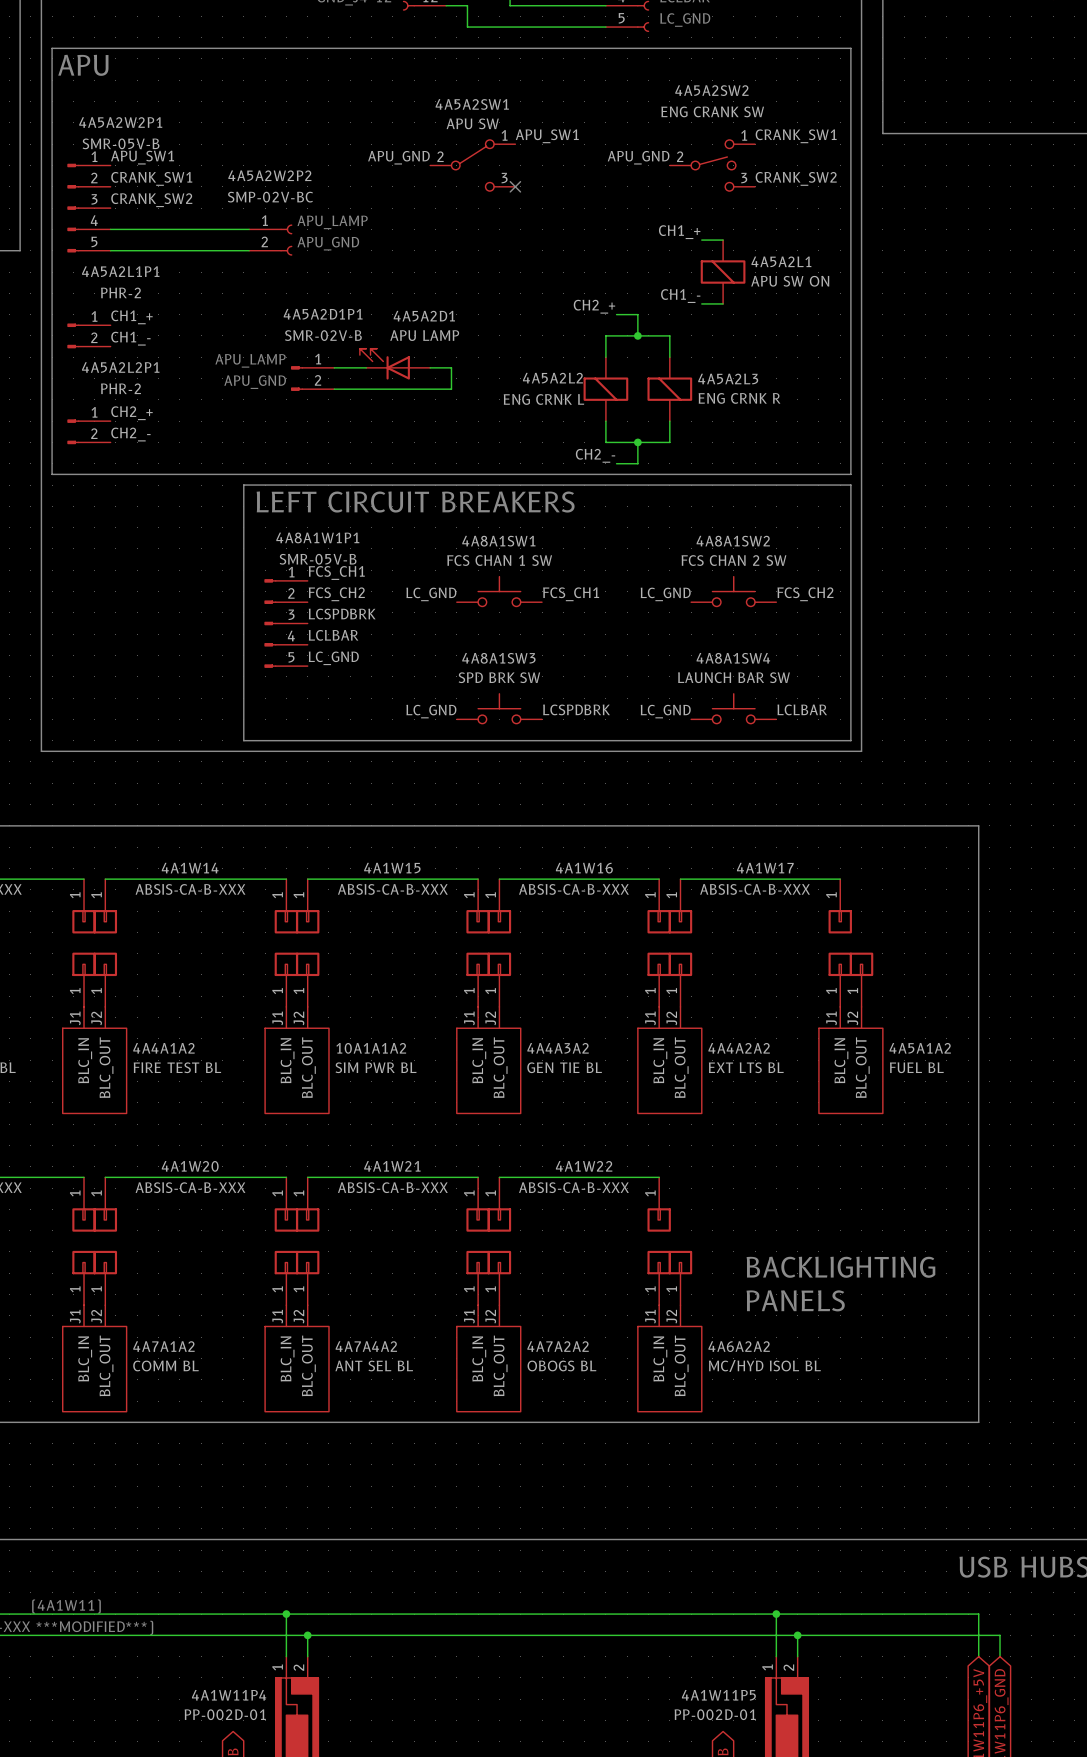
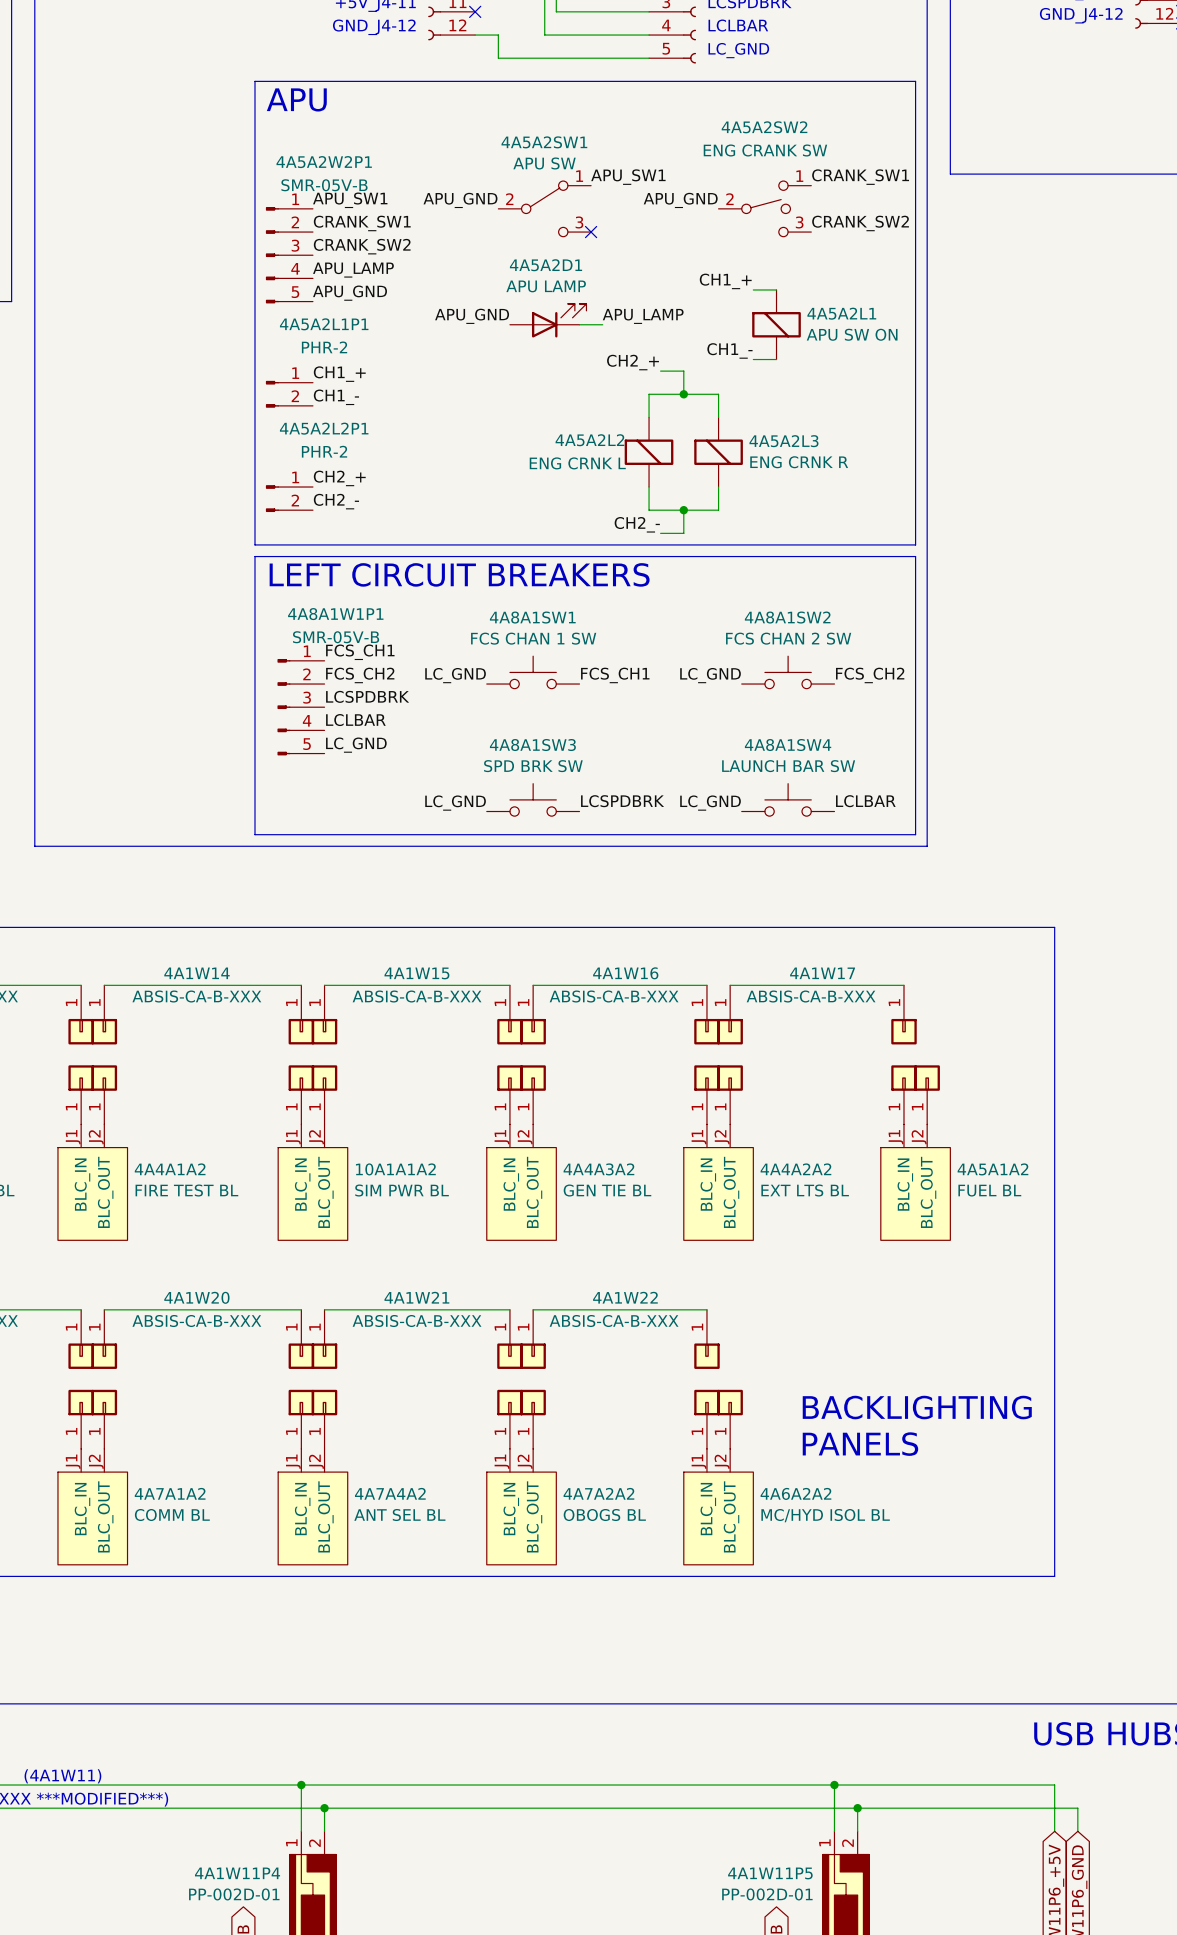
line: (243, 48) (52, 48) (52, 474) (243, 474) -> (254, 81) (254, 544)
text position: APU (83, 65) -> APU (296, 99)
label position: APU_SW1 (547, 136) -> APU_SW1 (628, 177)
label: APU_SW1 (142, 157) -> none
label: none -> APU_SW1 (350, 200)
label position: APU_GND (398, 157) -> APU_GND (460, 200)
4A5A2SW1 position: (472, 165) -> (544, 208)
label position: CRANK_SW1 (151, 178) -> CRANK_SW1 (362, 223)
no-connect mark position: (515, 186) -> (591, 232)
label position: CRANK_SW2 (151, 200) -> CRANK_SW2 (362, 246)
4A5A2W2P1 position: (89, 208) -> (289, 255)
label: none -> APU_LAMP (353, 270)
text: APU_LAMP (332, 222) -> none
wire: (110, 229) (249, 229) -> none
4A5A2W2P2: SMP-02V-BC (270, 240) -> none
label: none -> APU_GND (350, 293)
text: APU_GND (328, 243) -> none
wire: (110, 250) (249, 250) -> none
label: none -> APU_GND (472, 316)
label: none -> APU_LAMP (643, 316)
wire: none -> (579, 324) (602, 324)
4A5A2D1 name position: 4A5A2D1 (424, 316) -> 4A5A2D1 (546, 265)
label position: CH1_+ (131, 317) -> CH1_+ (339, 374)
4A5A2L1P1 position: (89, 335) -> (289, 394)
4A5A2D1 value position: APU LAMP (424, 335) -> APU LAMP (546, 286)
label position: CH1_- (130, 338) -> CH1_- (336, 397)
text: APU_LAMP (250, 360) -> none
4A5A2D1 flip: as is (384, 364) -> left-right (559, 320)
4A5A2D1 position: (395, 364) -> (548, 320)
wire: (334, 367) (366, 367) -> none
wire: (430, 367) (451, 367) (451, 389) (334, 389) -> none
4A5A2D1P1: SMR-02V-B (312, 378) -> none
text: APU_GND (255, 382) -> none
label position: CH2_+ (131, 413) -> CH2_+ (339, 478)
4A5A2L2P1 position: (89, 431) -> (289, 498)
label position: CH2_- (130, 434) -> CH2_- (336, 501)

